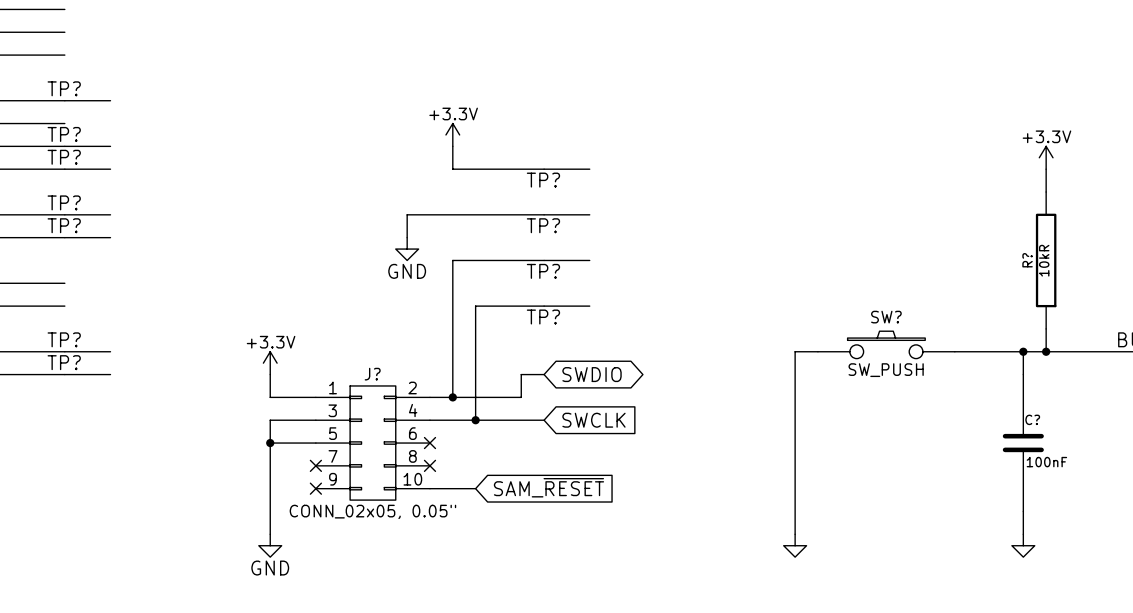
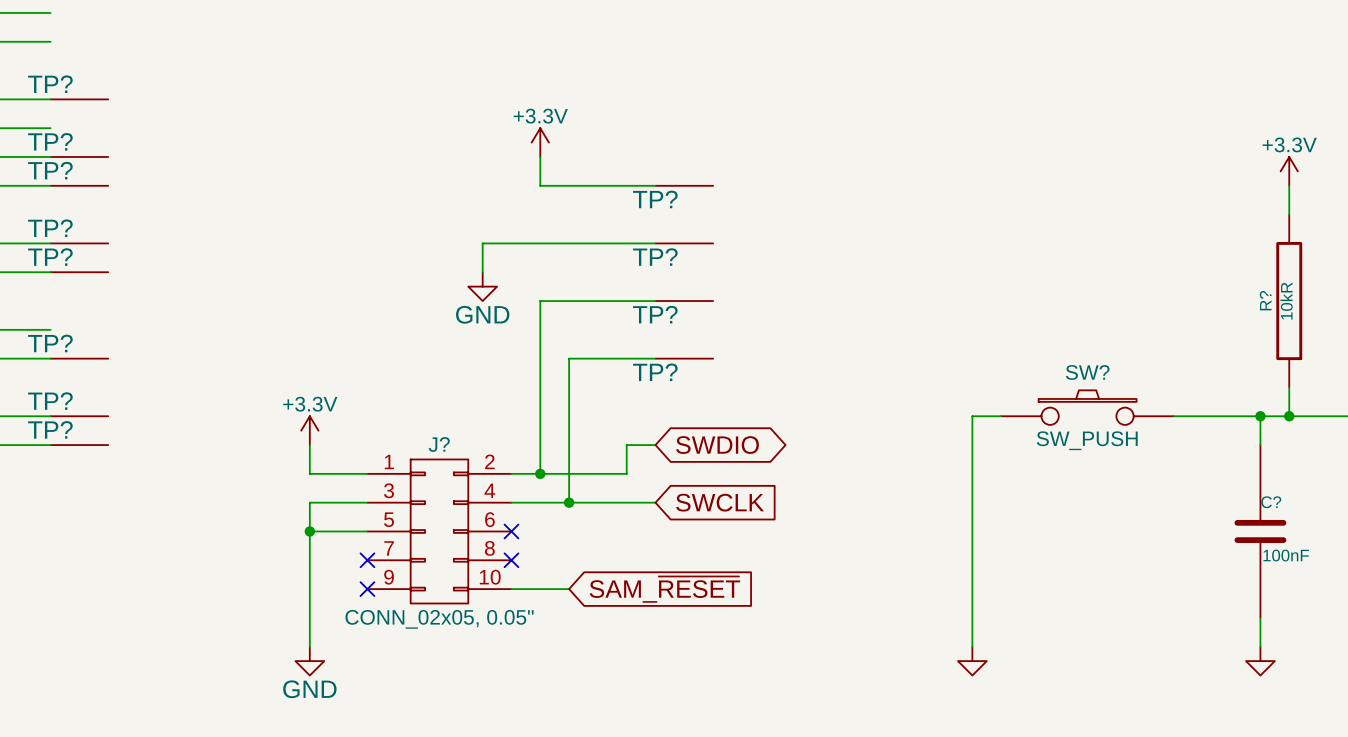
TP?: none -> (79, 358)

